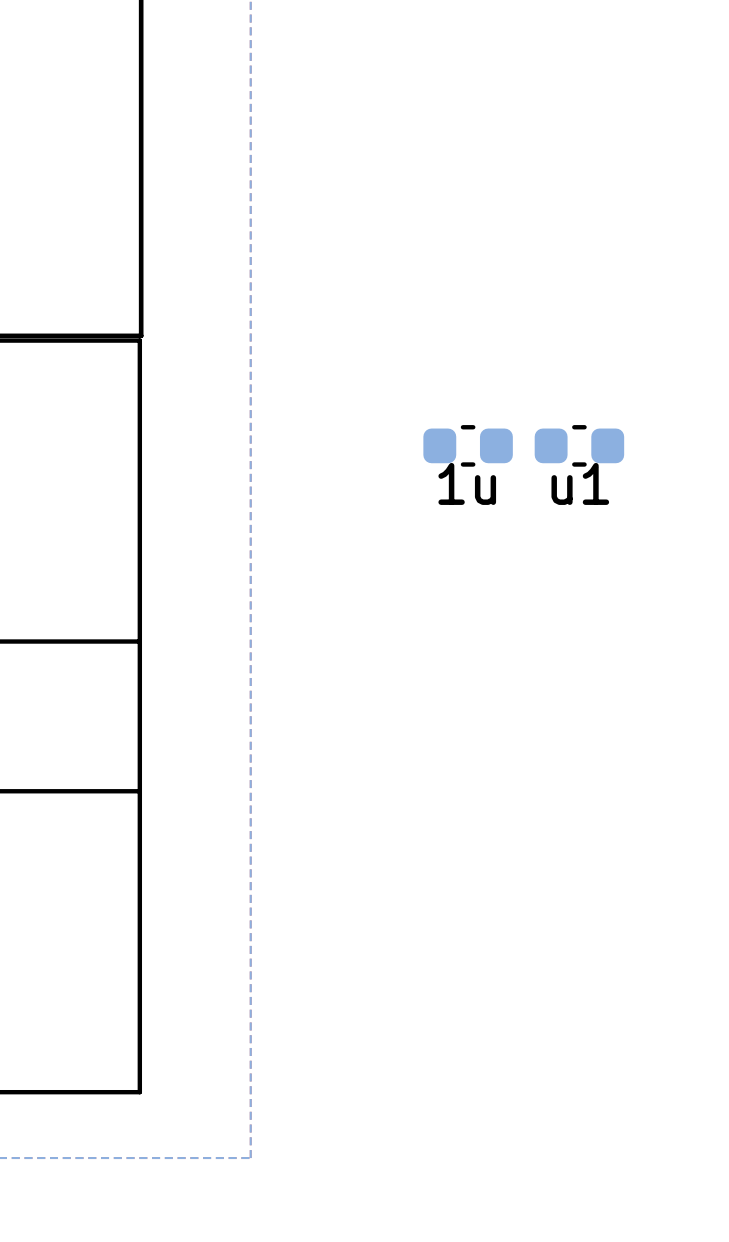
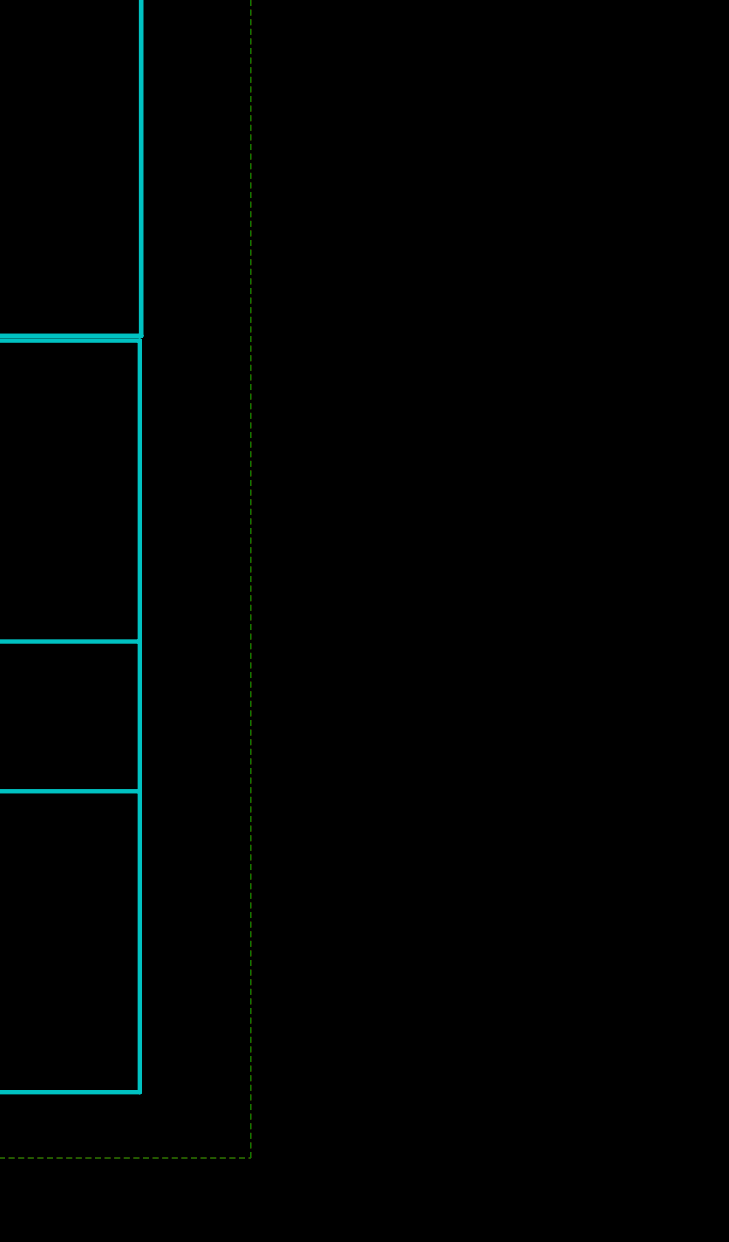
part: 1u (468, 445) -> none
part: u1 (579, 445) -> none

